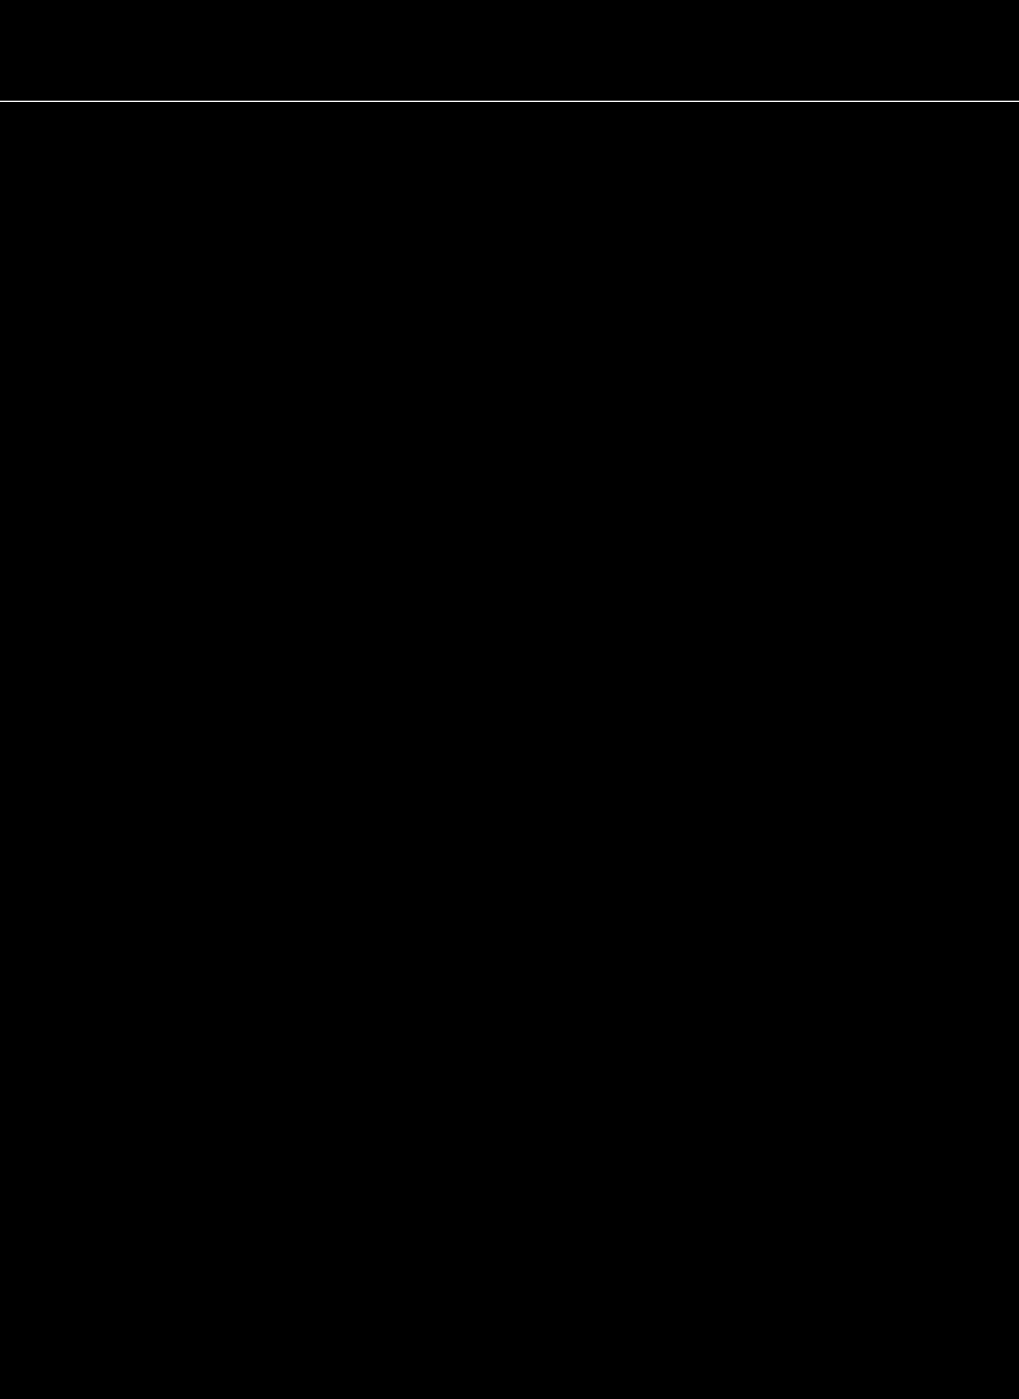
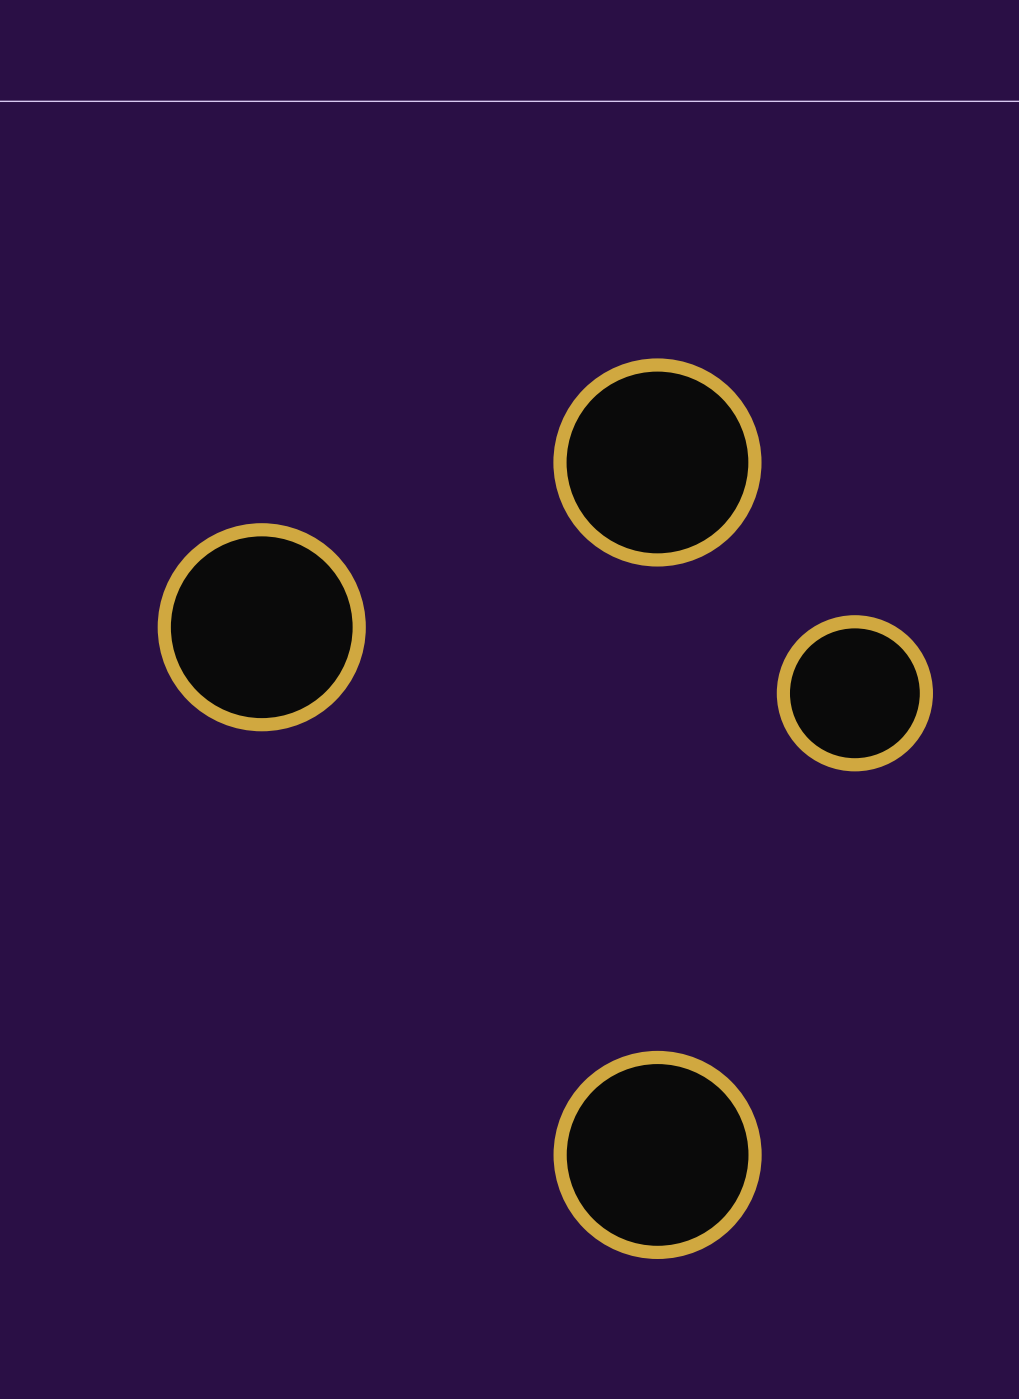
via: none -> (657, 462)
via: none -> (261, 627)
via: none -> (854, 693)
via: none -> (657, 1154)

